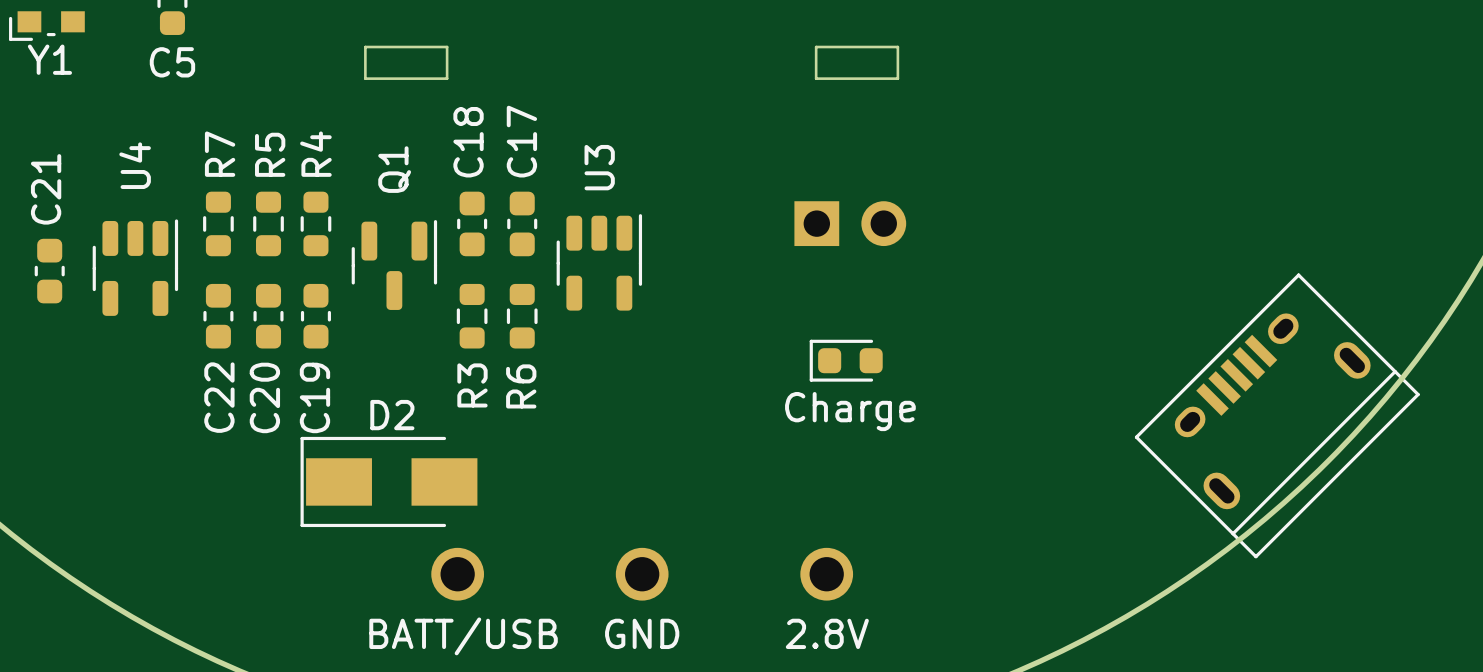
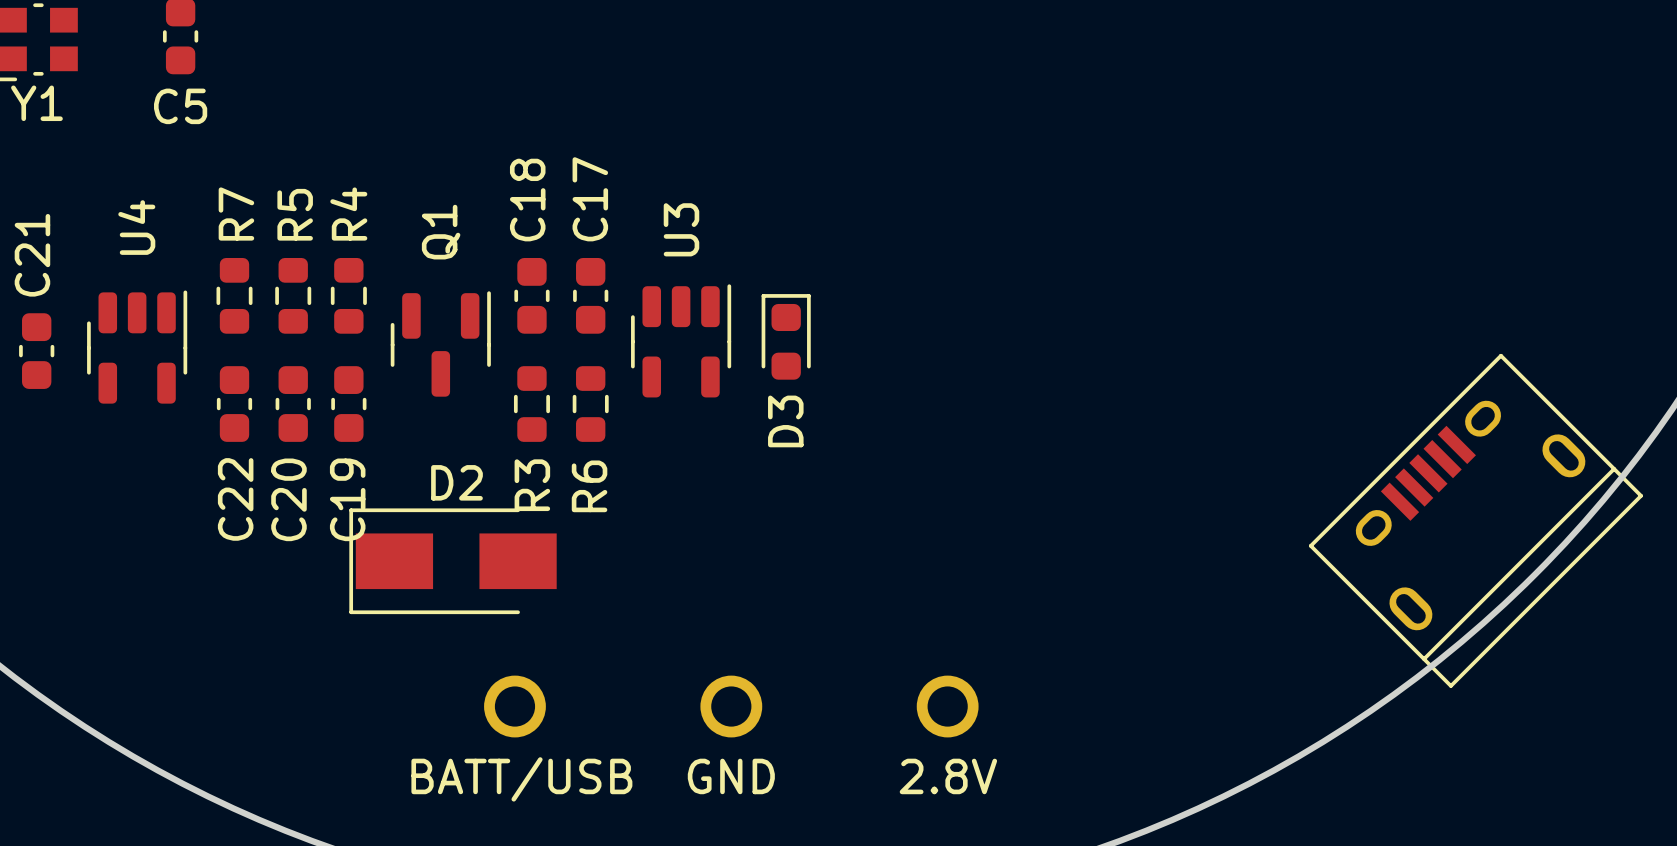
board edge: (365, 47) (447, 47) (447, 78) (365, 78) (365, 47) -> none
board edge: (816, 47) (897, 47) (897, 78) (816, 78) (816, 47) -> none
part: (850, 223) -> none
D3: none -> (786, 336)
part: (846, 360) -> none
text: Charge (850, 411) -> none
D2 position: (388, 481) -> (453, 561)

